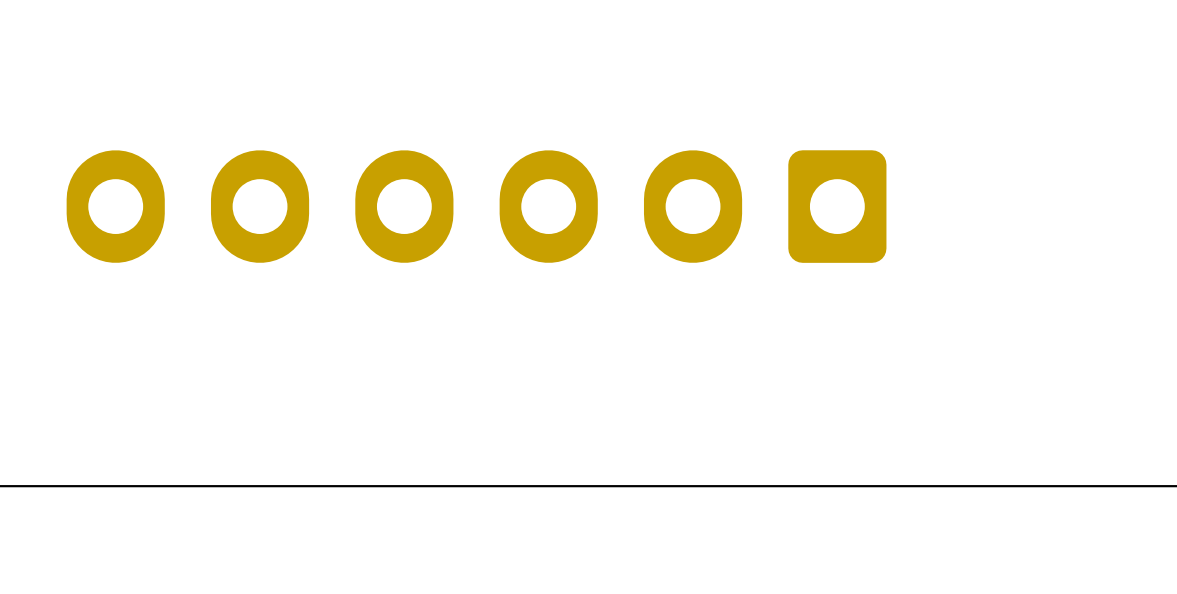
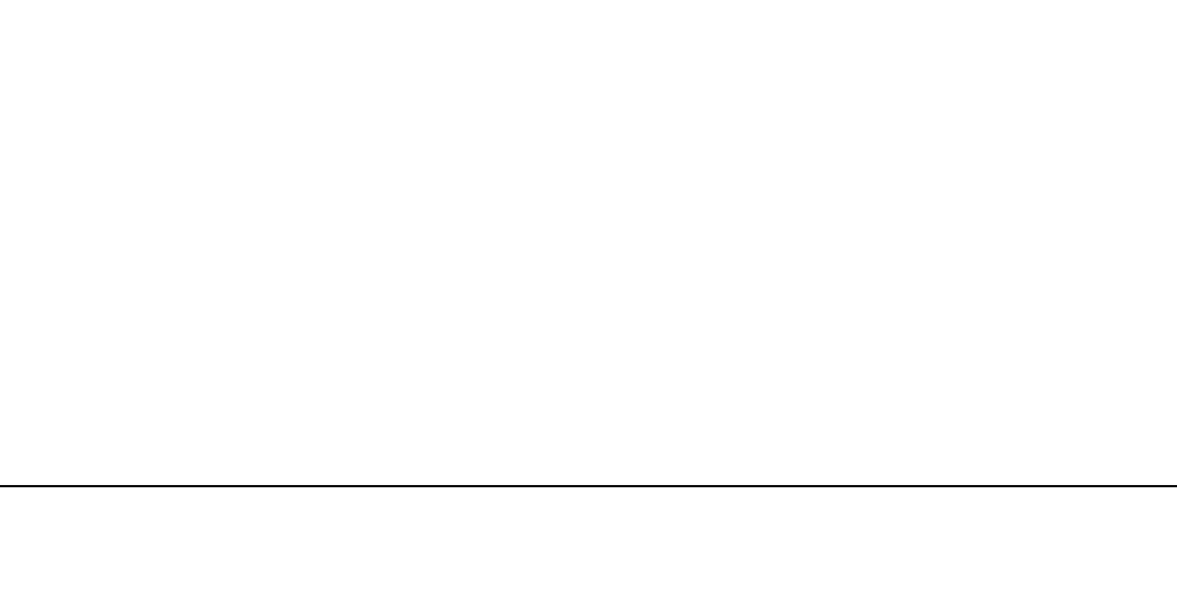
part: (476, 206) -> none

